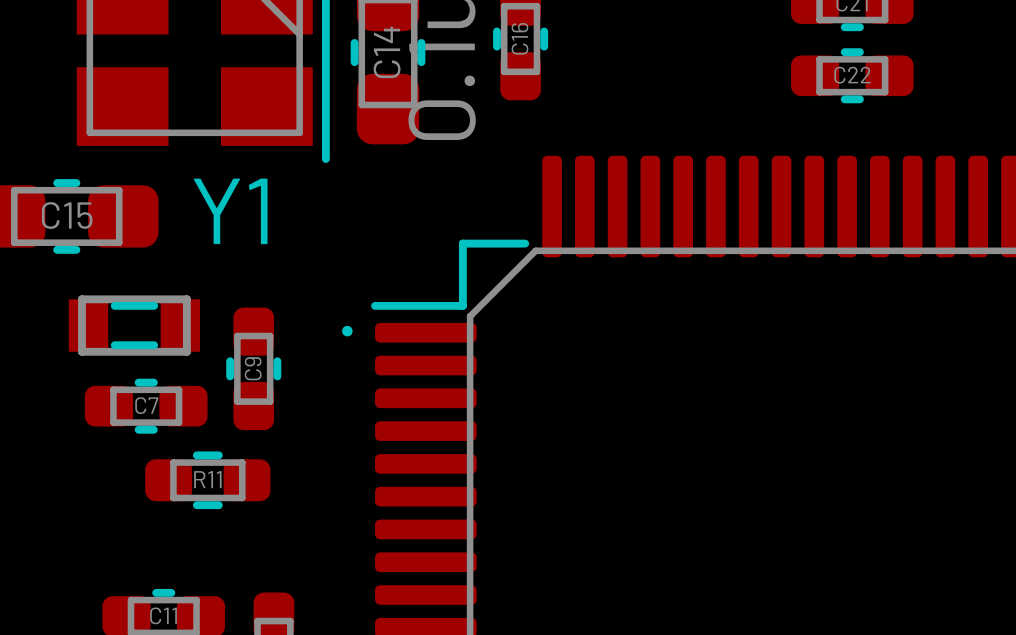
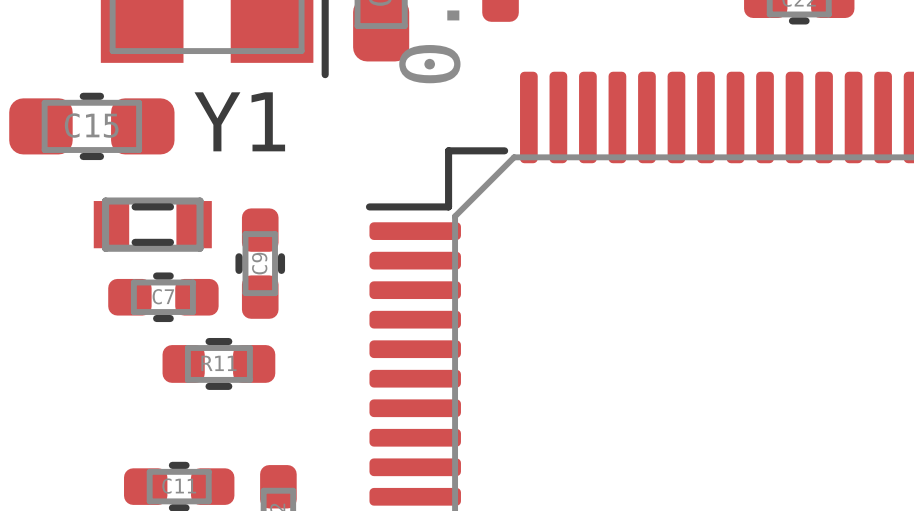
text: . (347, 331) -> none

